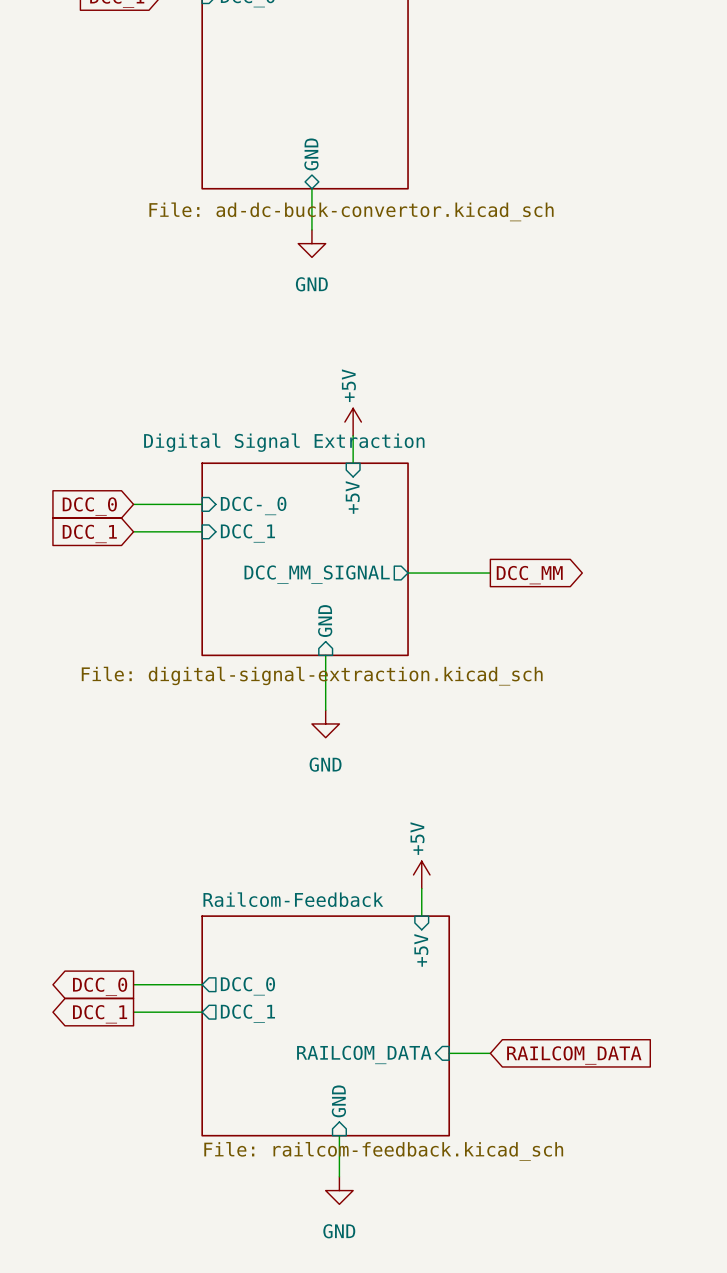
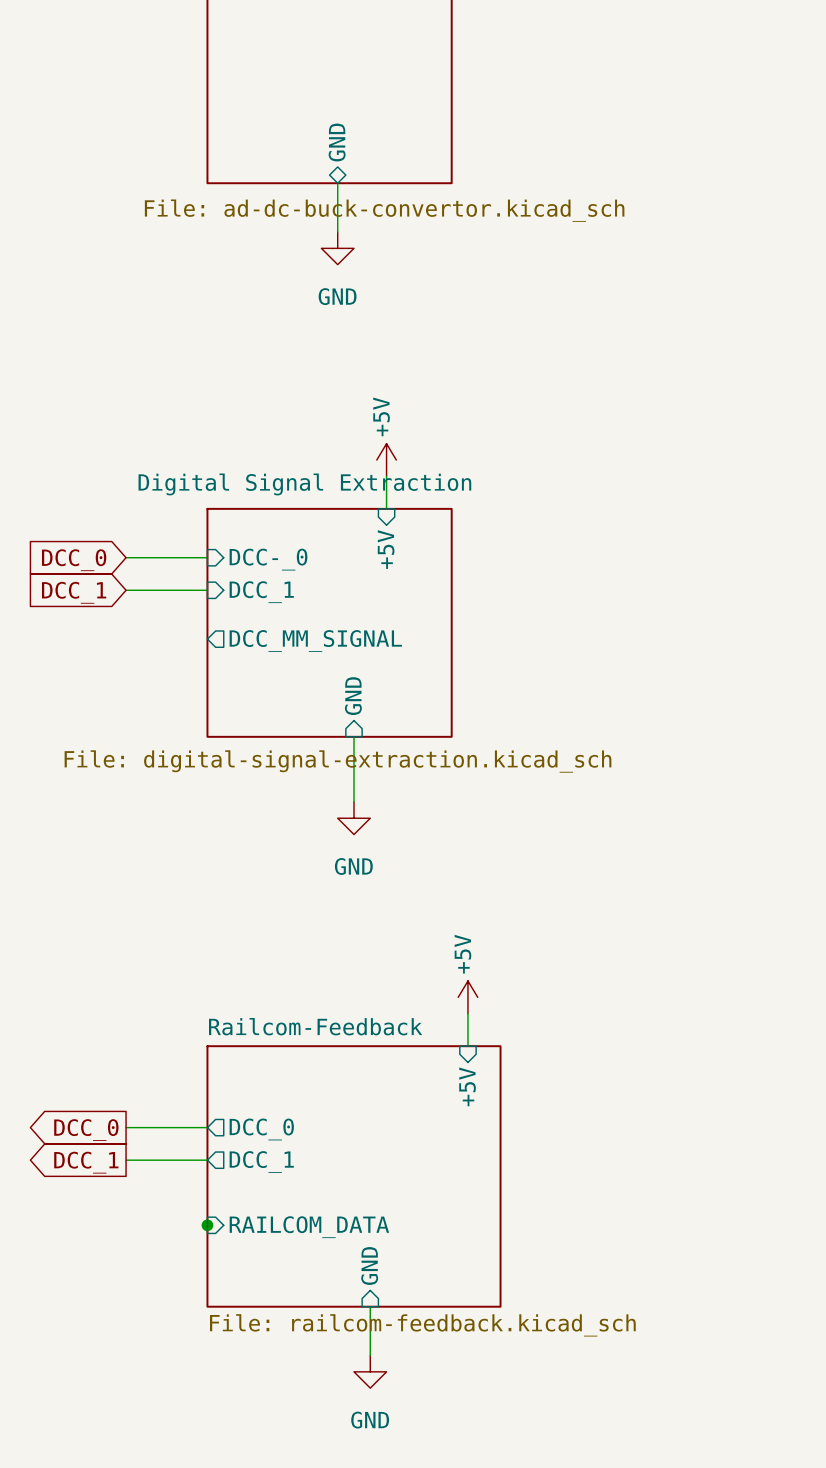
wire: (408, 573) (490, 573) -> none
sheet pin rotation: 0° (317, 574) -> 180° (315, 641)
global label: DCC_MM (529, 575) -> none
wire: (449, 1053) (490, 1053) -> none
sheet pin rotation: 0° (364, 1054) -> 180° (309, 1227)
global label: RAILCOM_DATA (574, 1055) -> none
junction: none -> (207, 1225)

